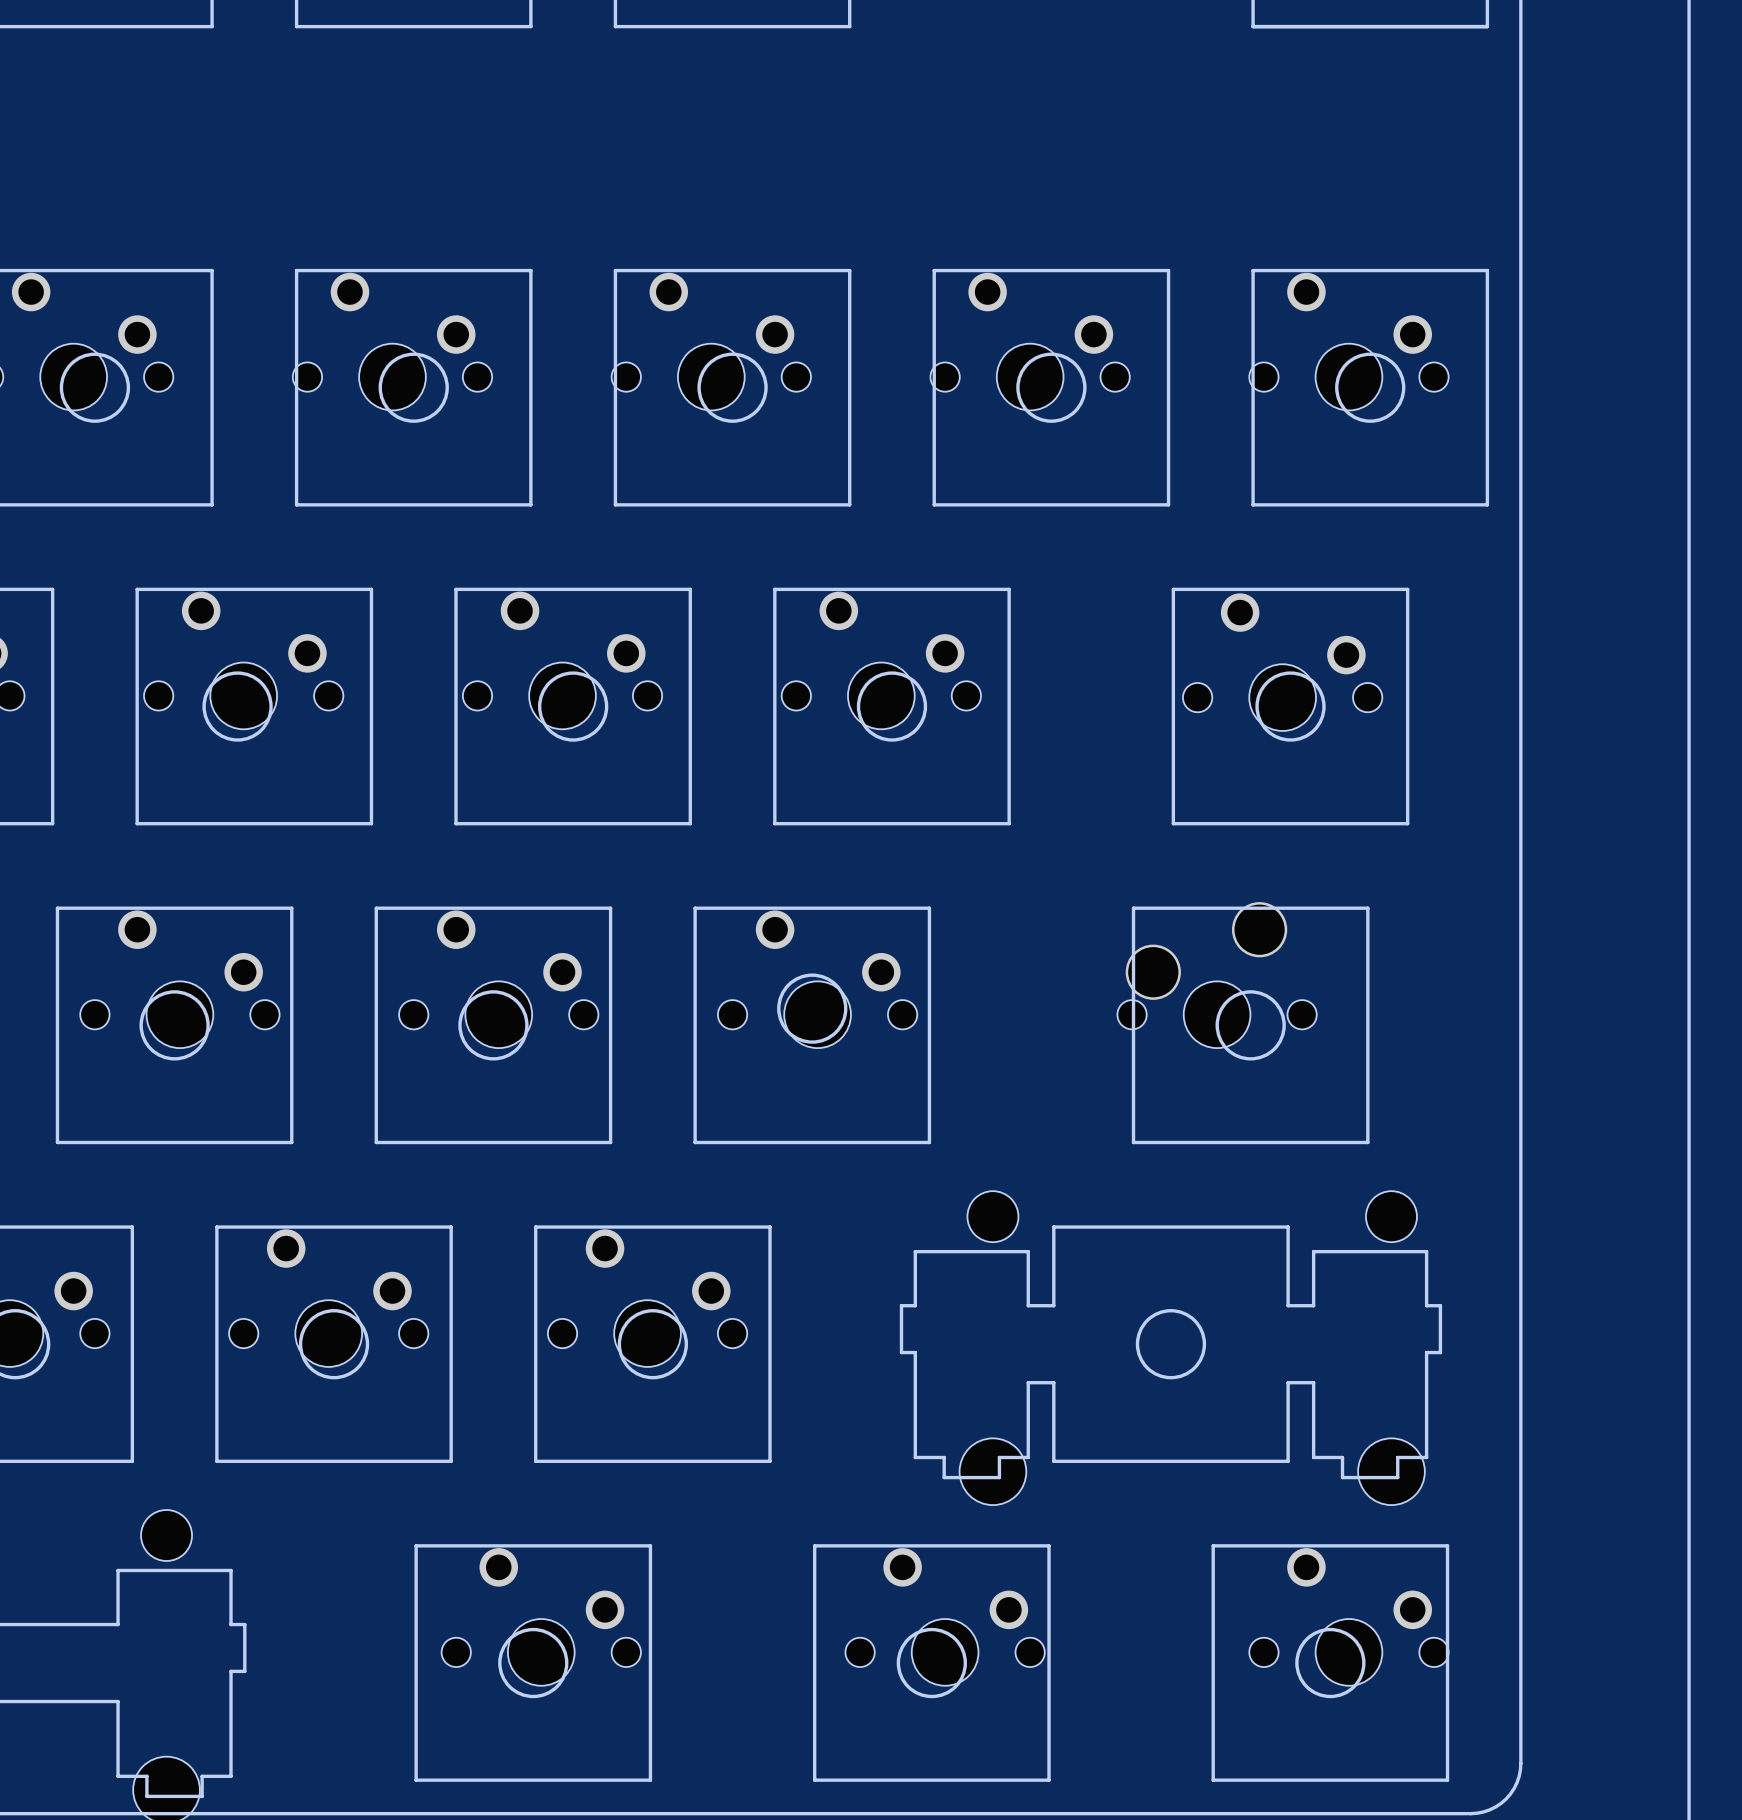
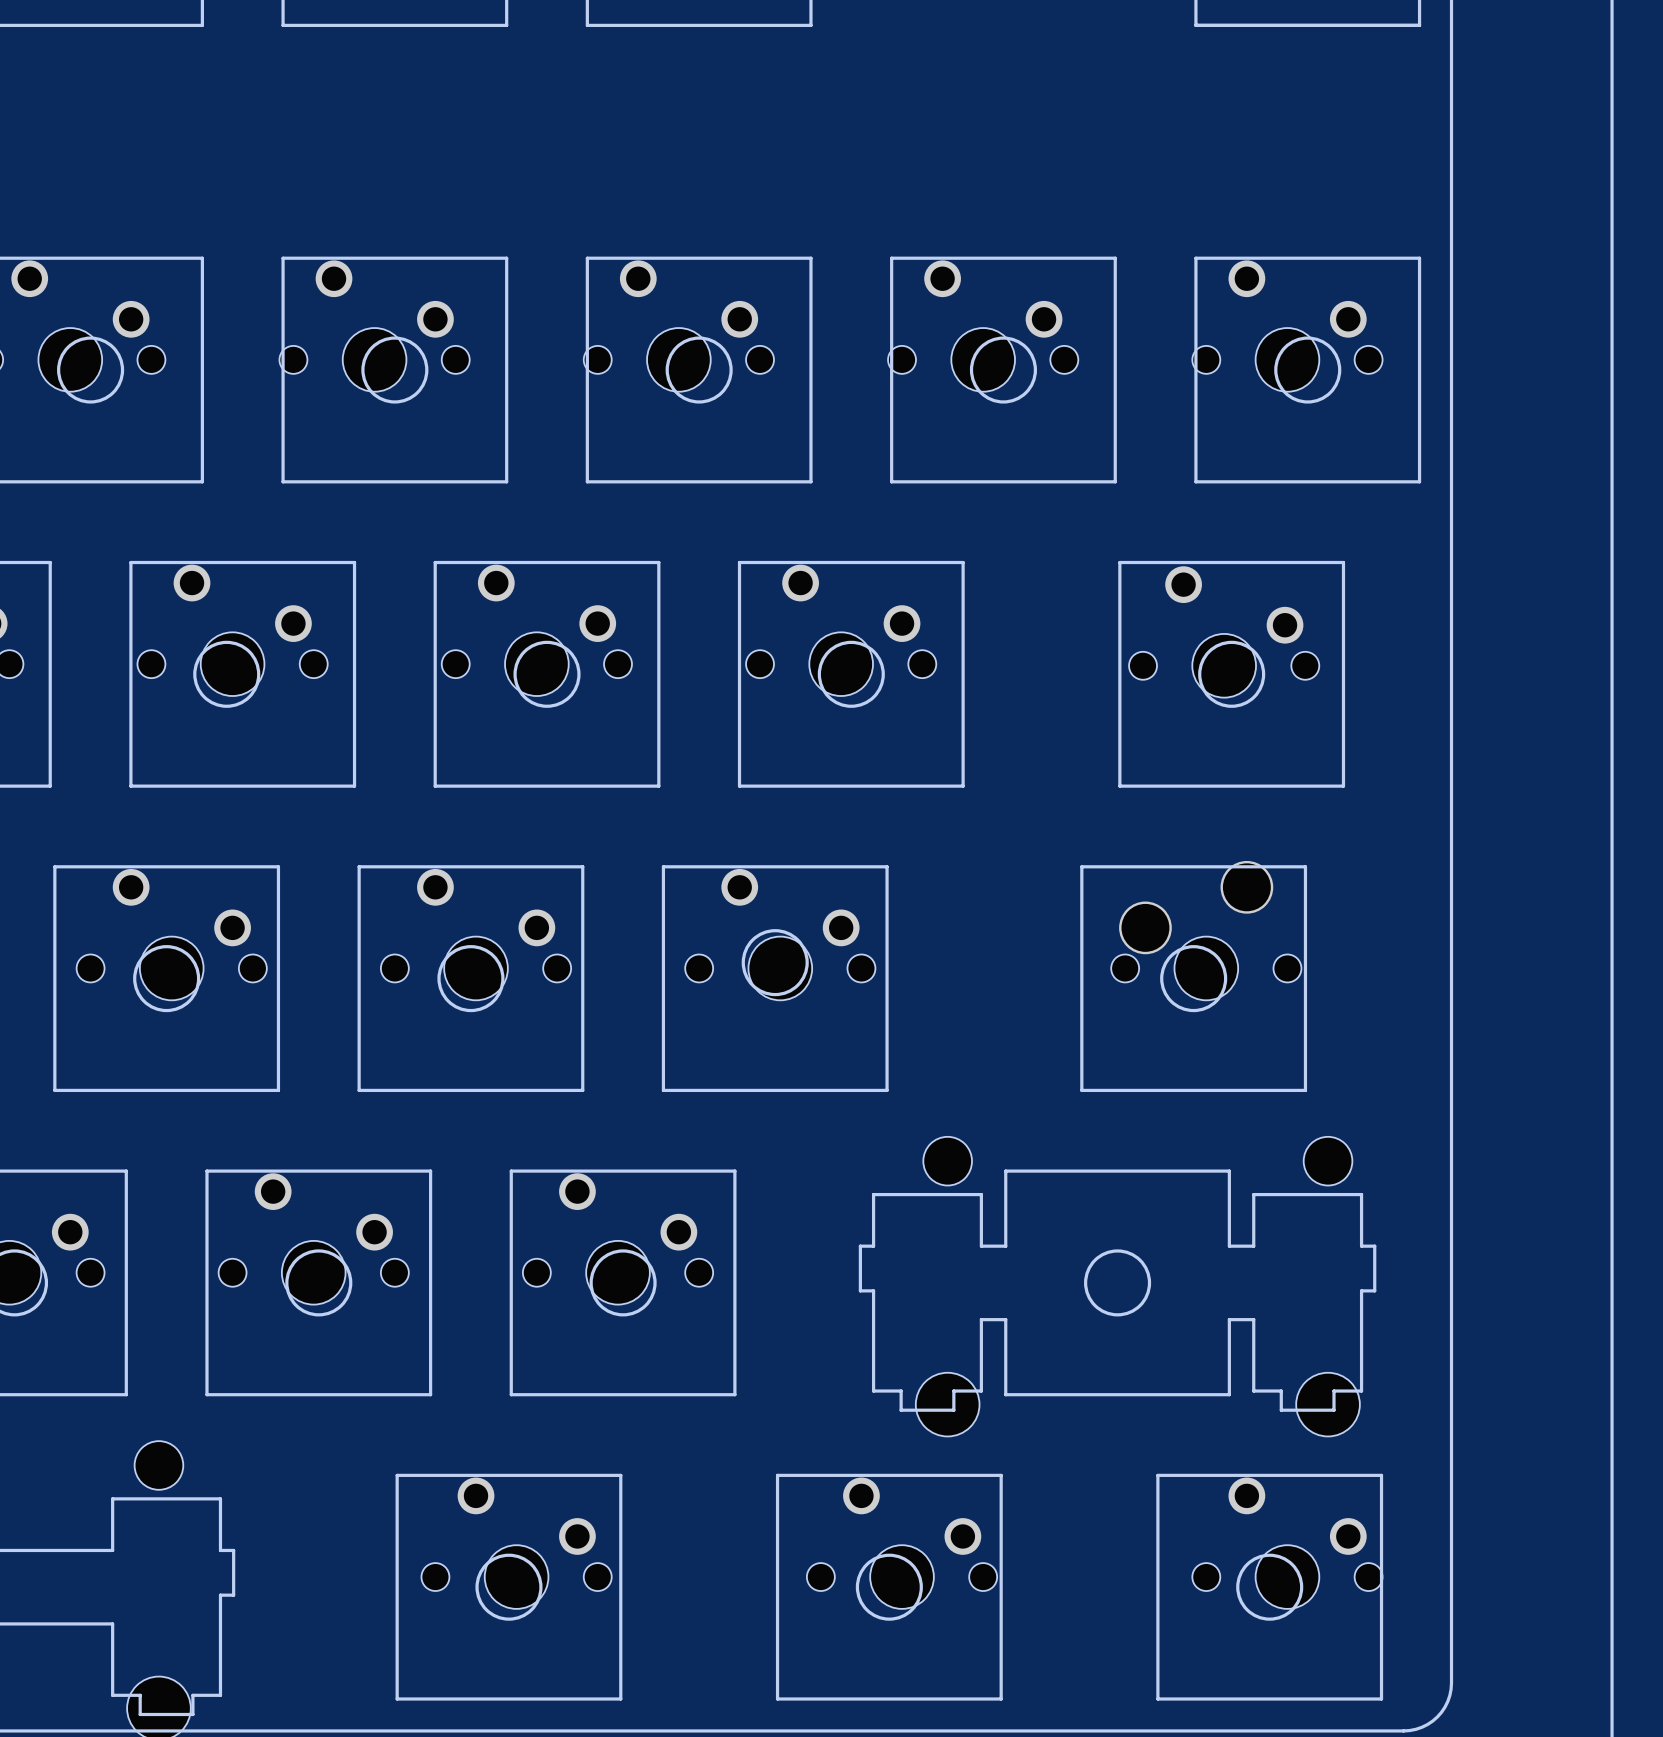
part position: (1217, 975) -> (1206, 930)

